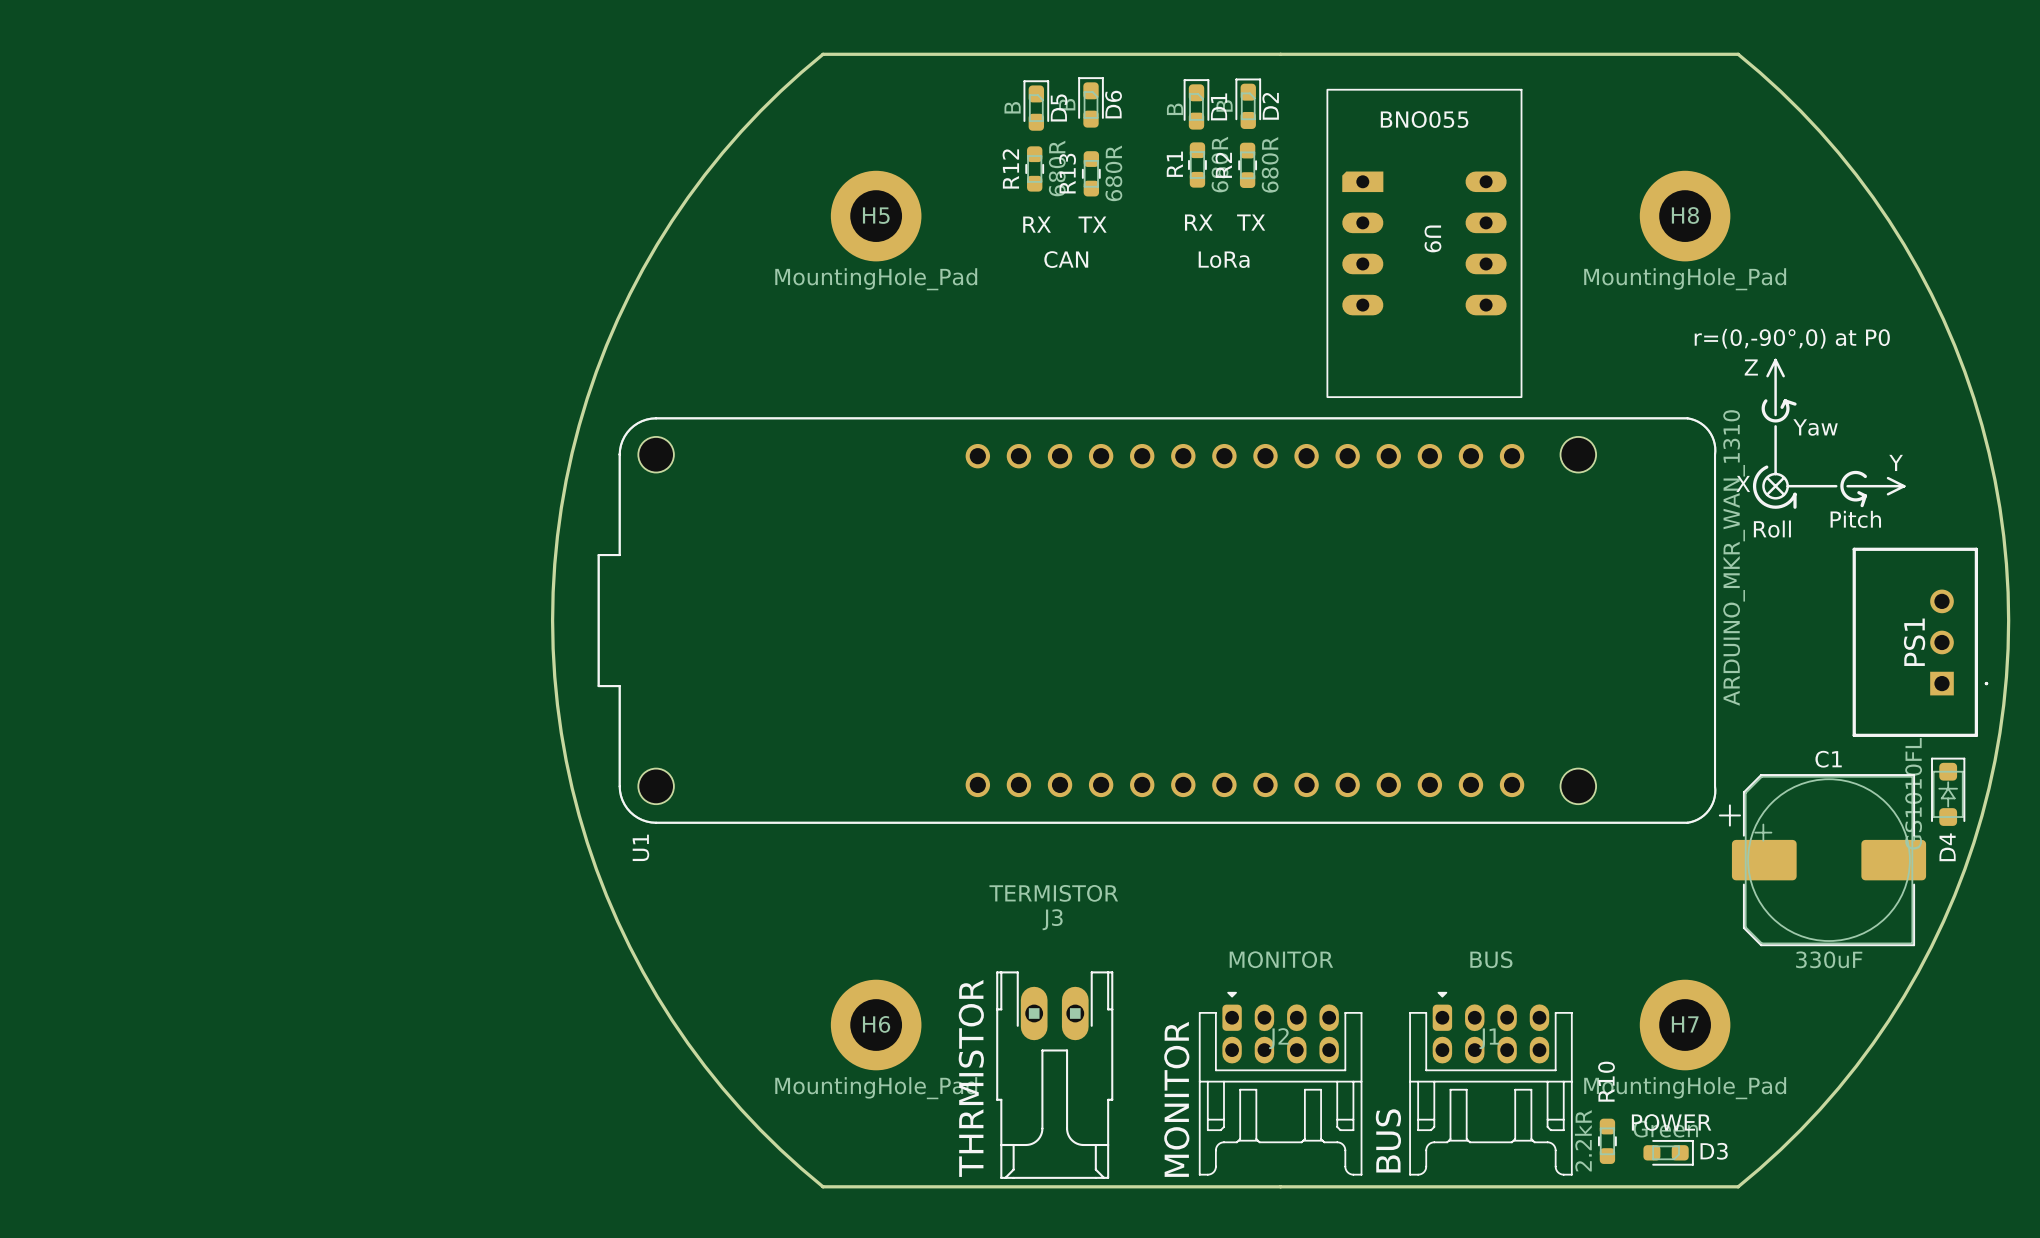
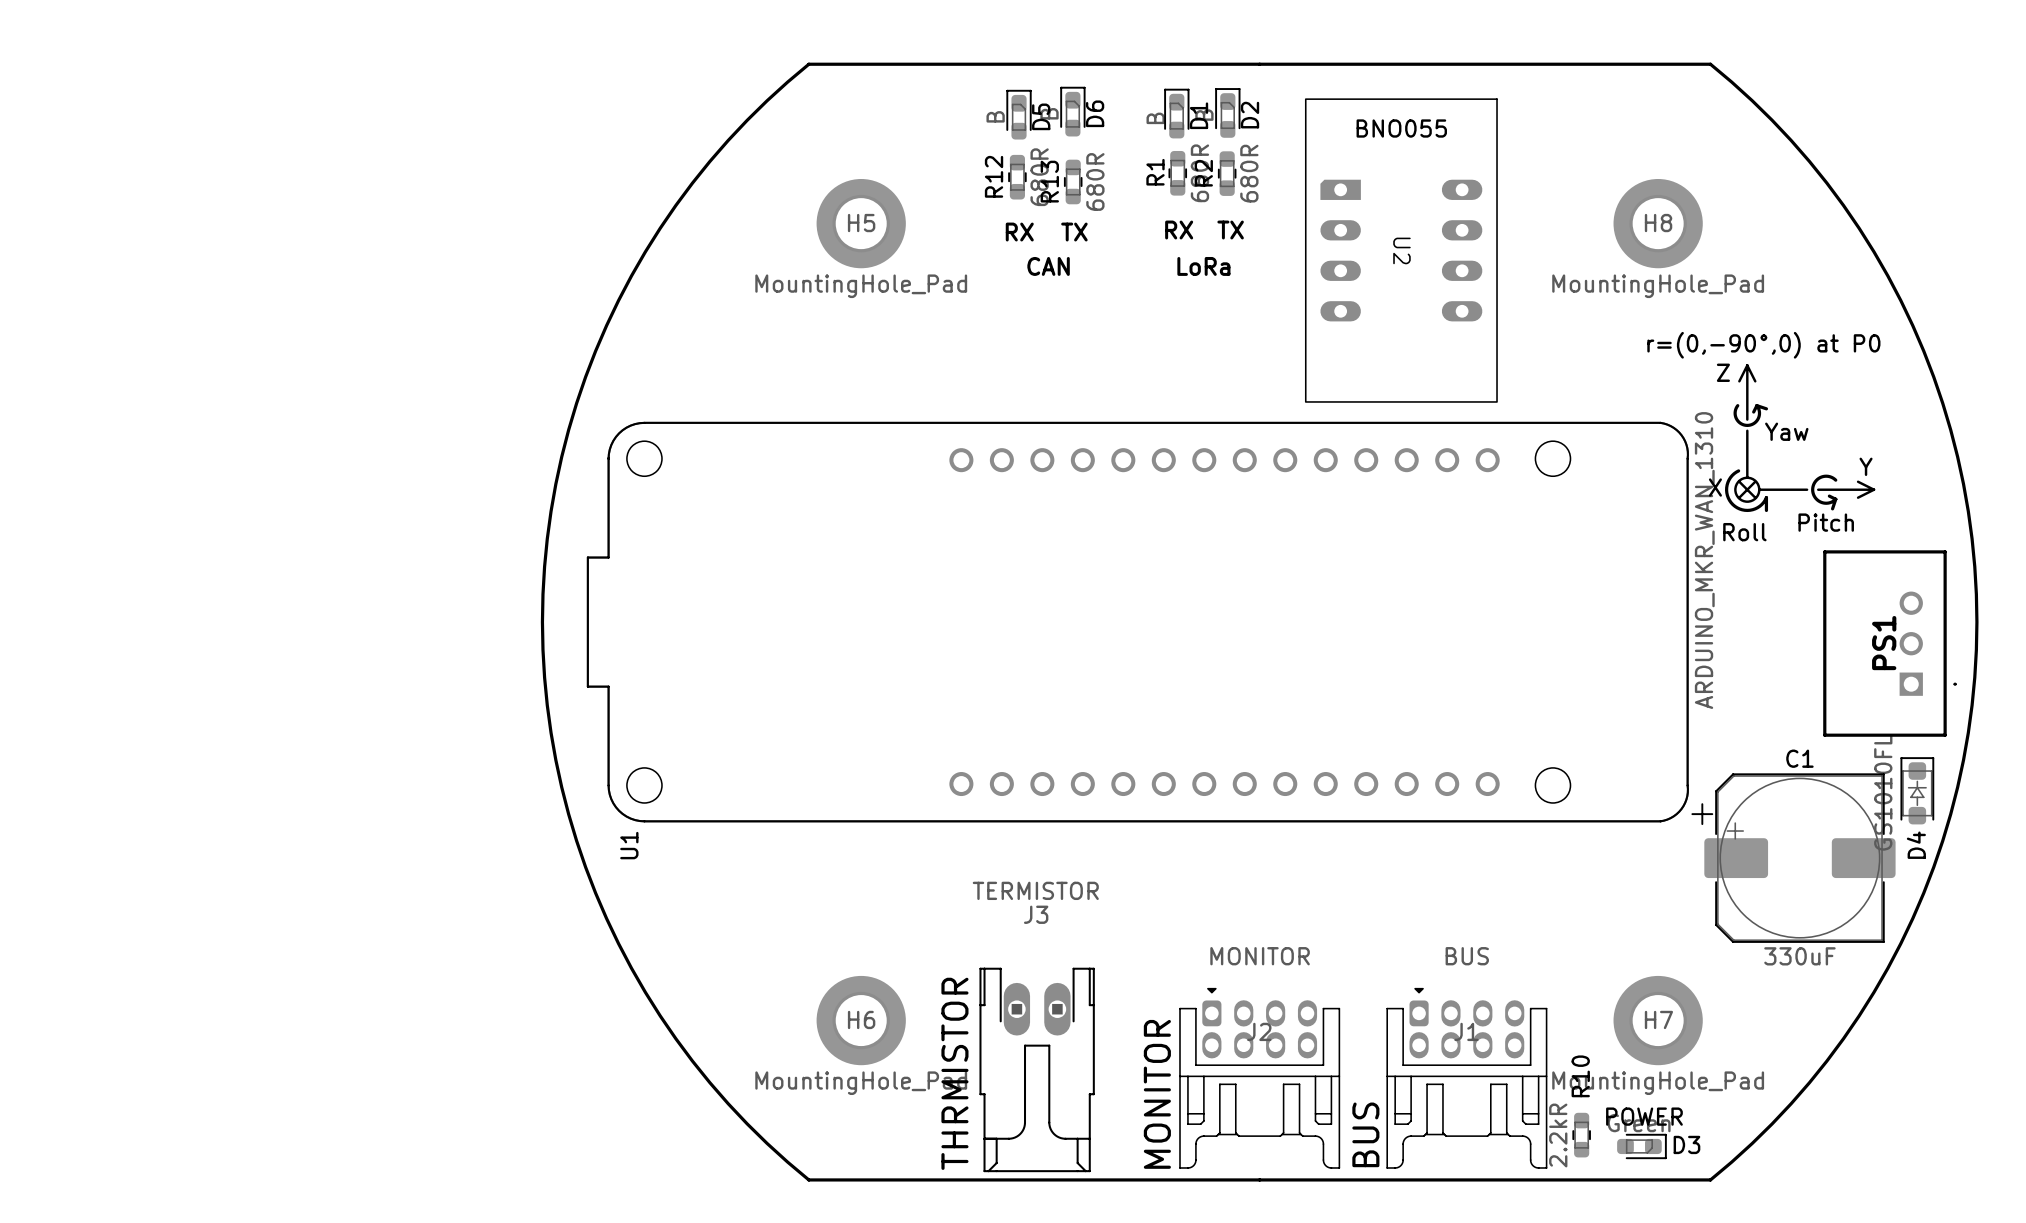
U9 name: U9 (1432, 238) -> U2 (1401, 250)

